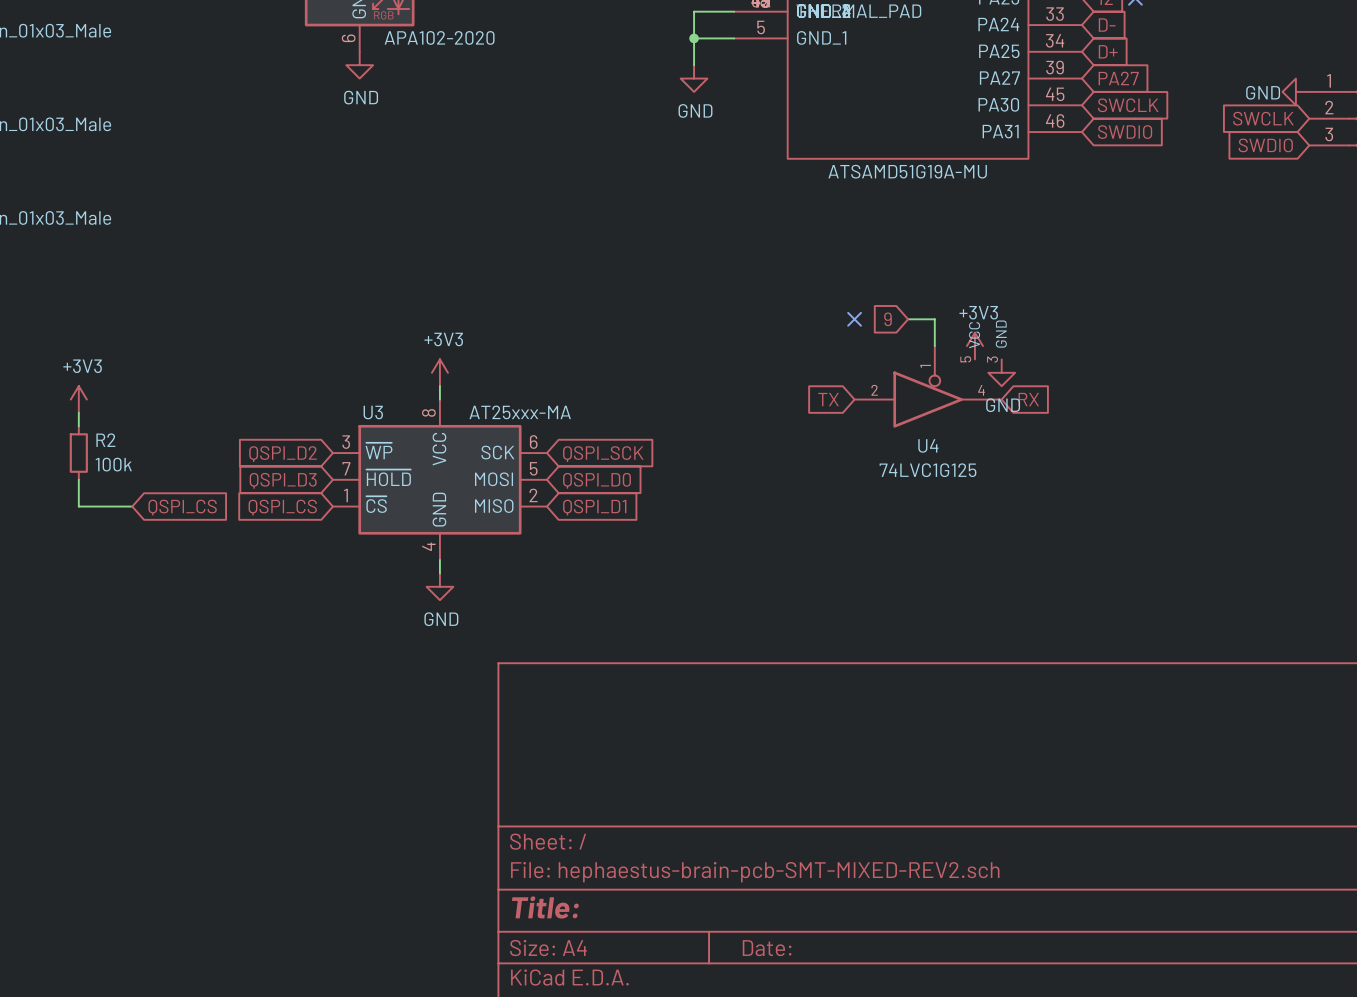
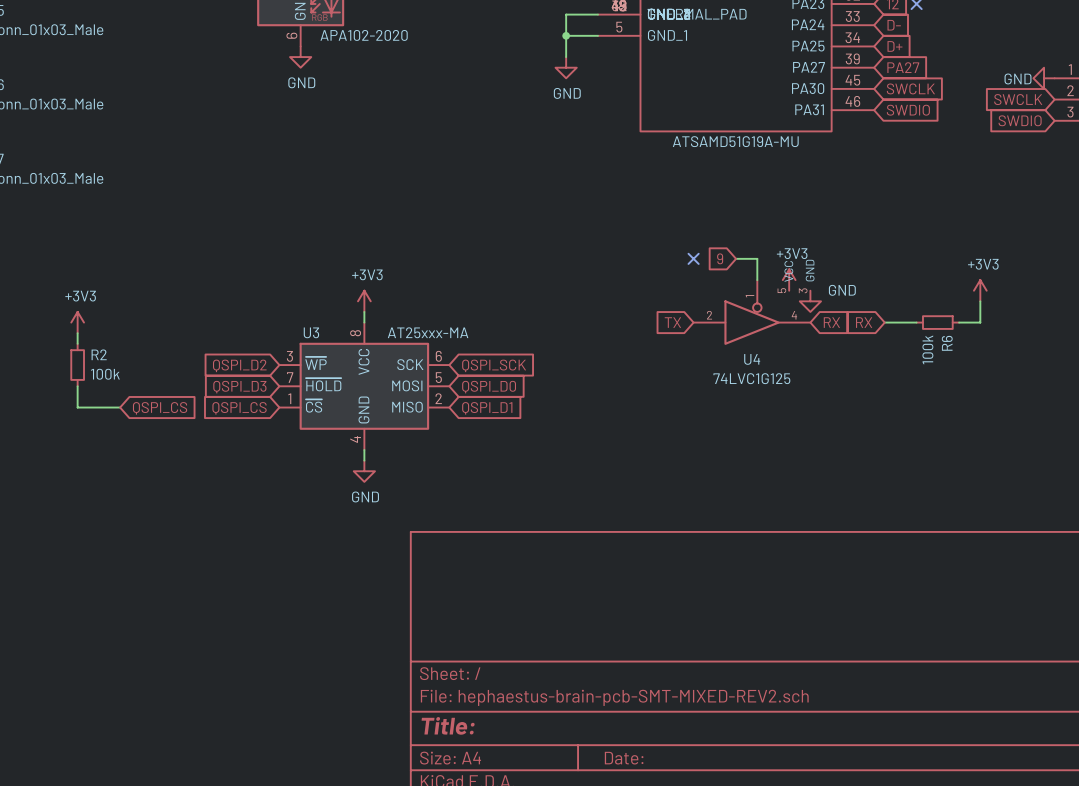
power symbol: none -> +3V3 (980, 290)
wire: none -> (980, 301) (980, 322) (959, 322)
global label: none -> RX (864, 322)
wire: none -> (884, 322) (916, 322)
R6: none -> 100k (937, 322)
power symbol text position: GND (1003, 405) -> GND (842, 290)

